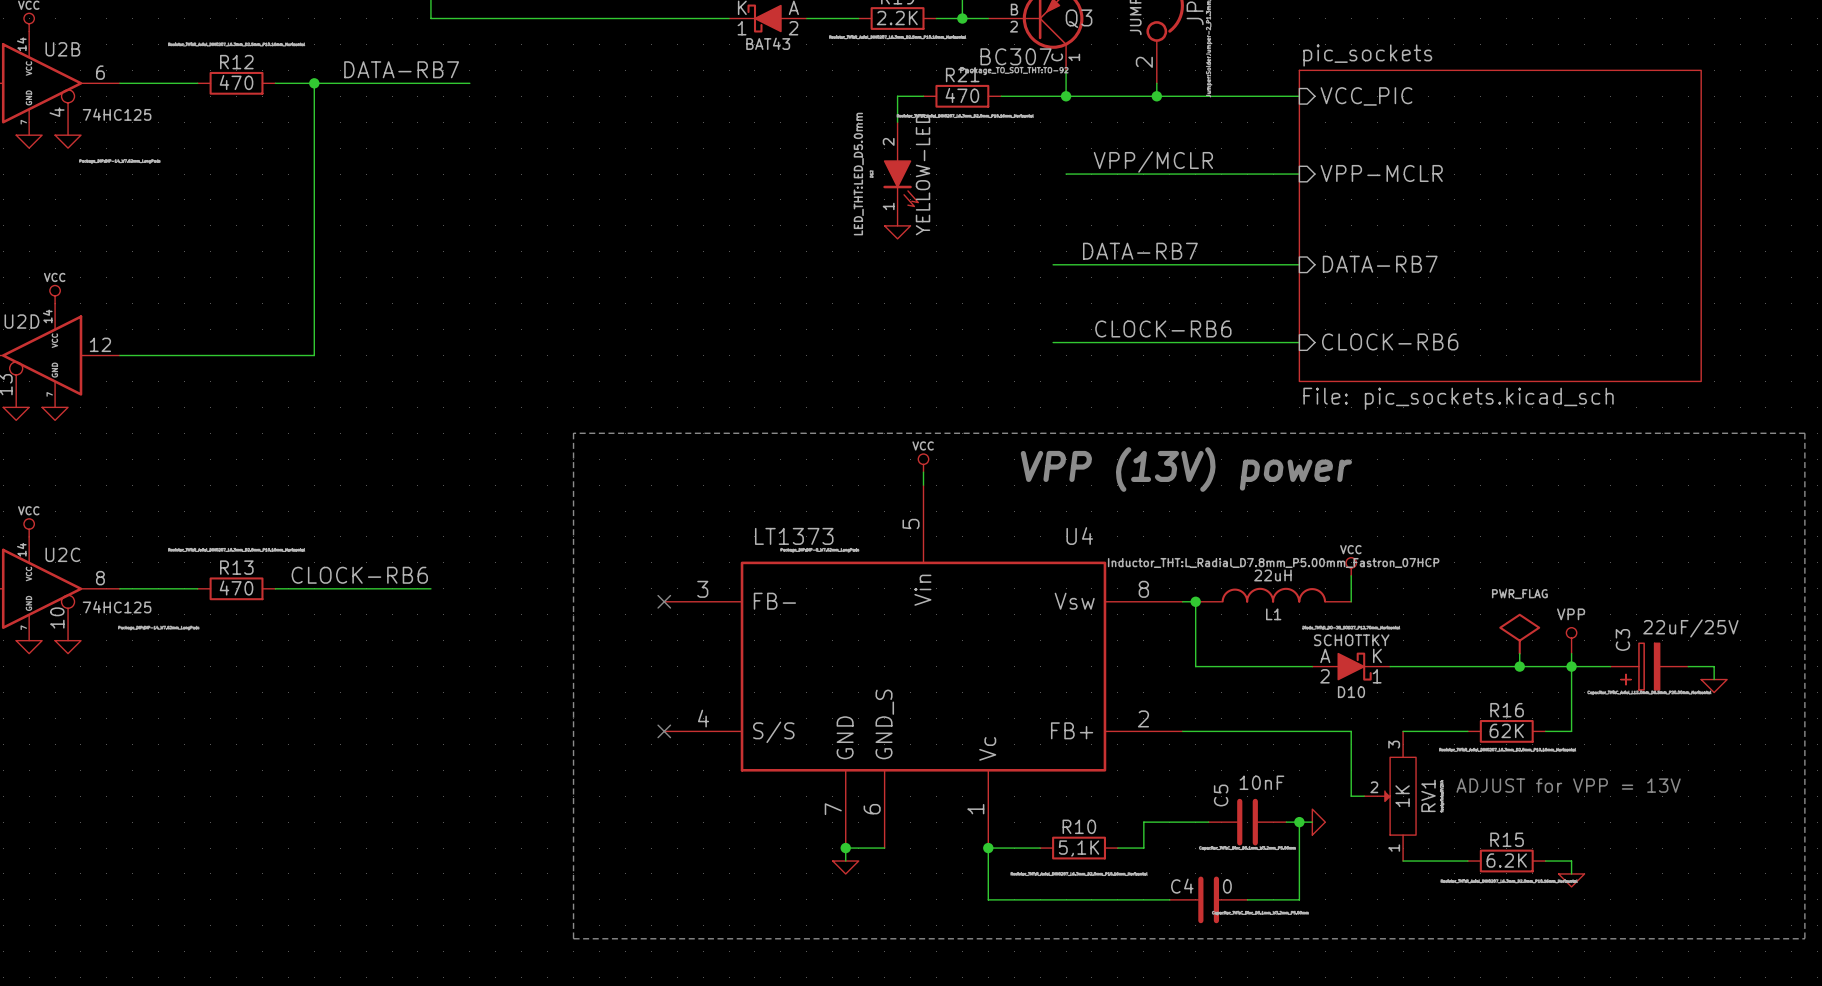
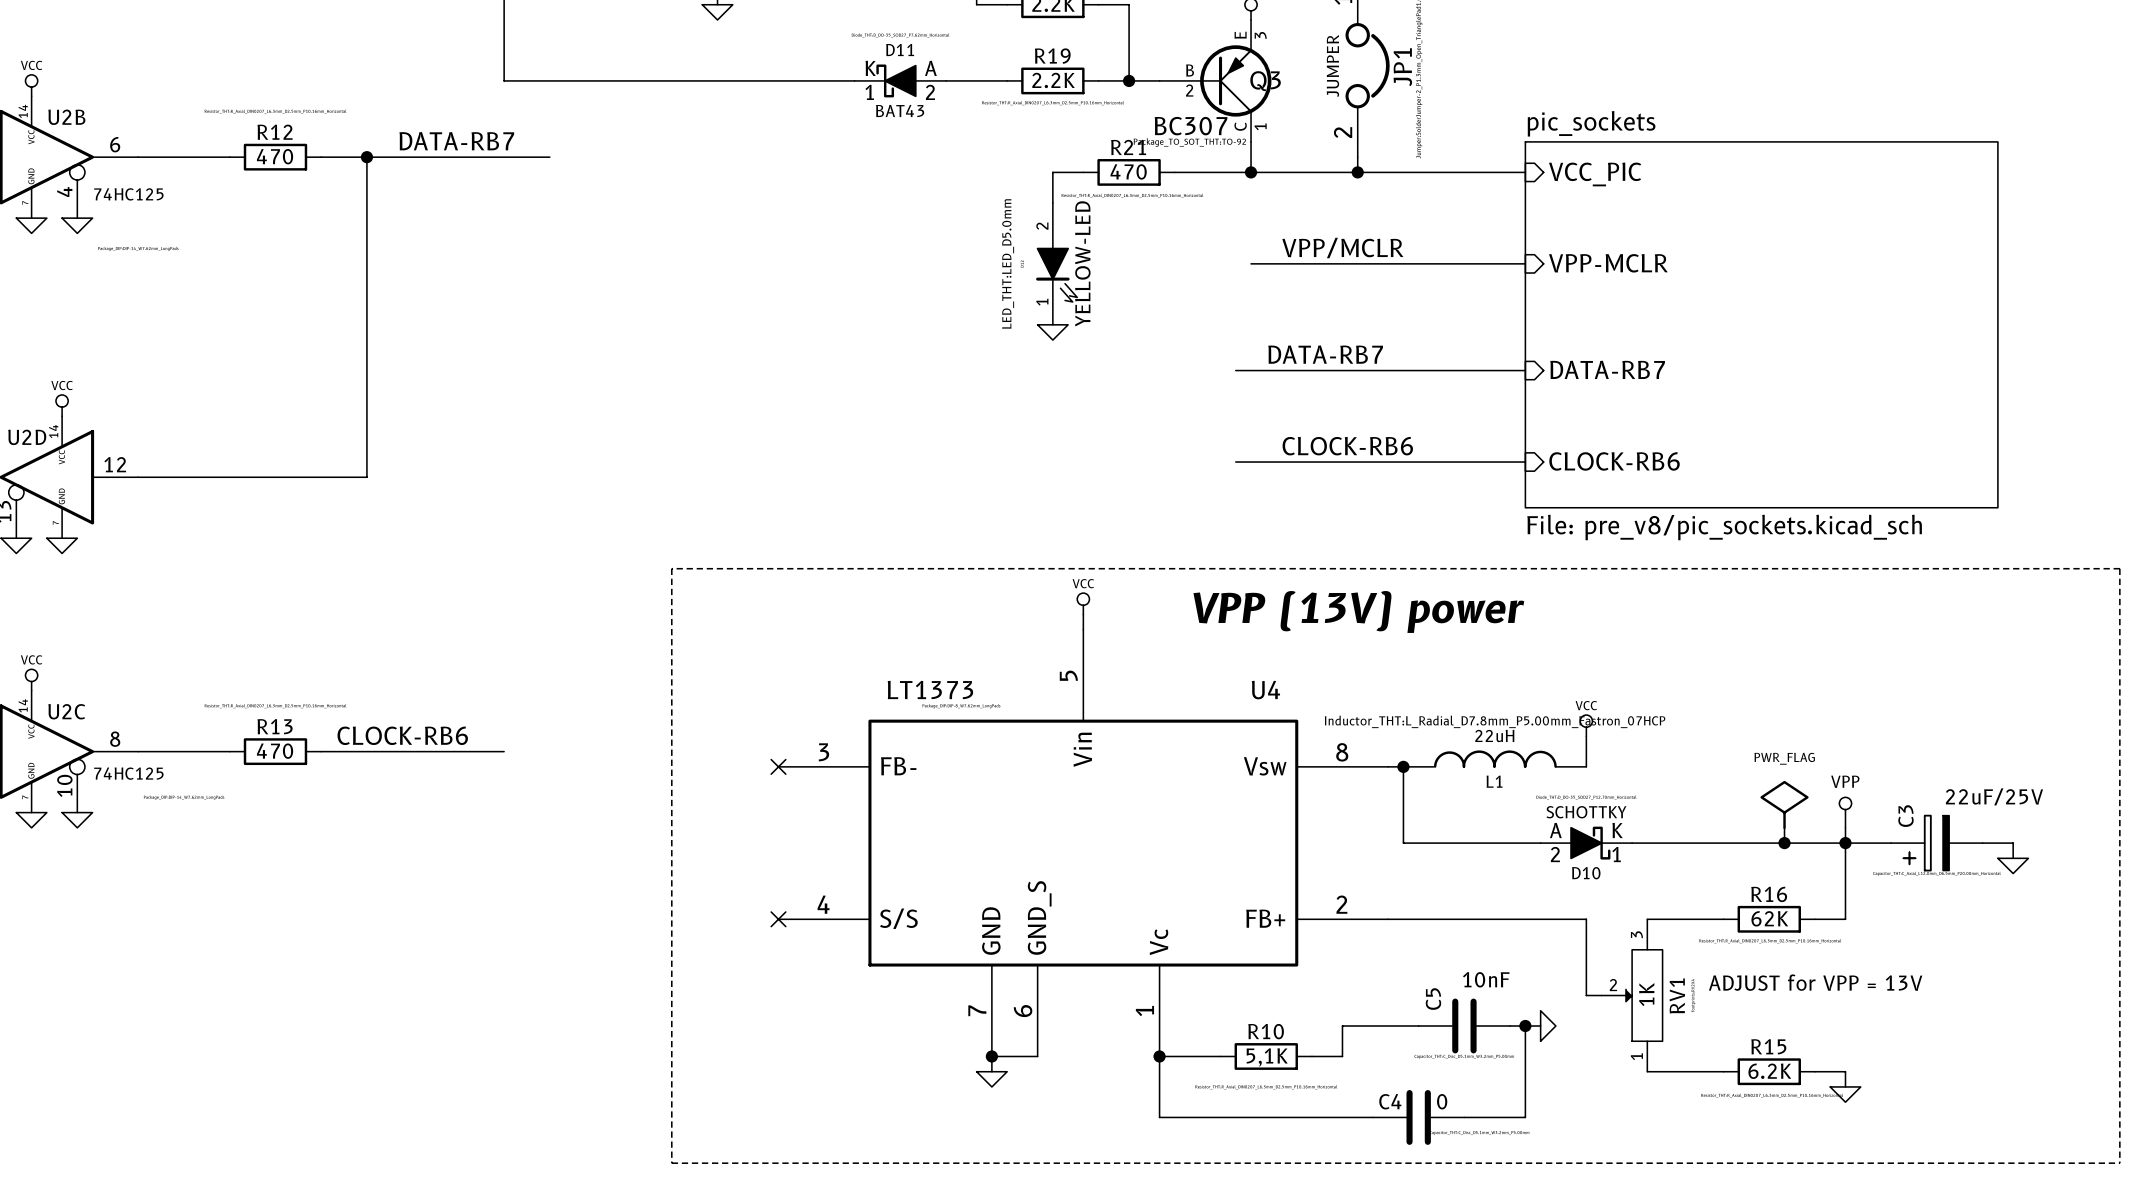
sheet pic_sockets value: File: pic_sockets.kicad_sch (1458, 398) -> File: pre_v8/pic_sockets.kicad_sch (1724, 527)

